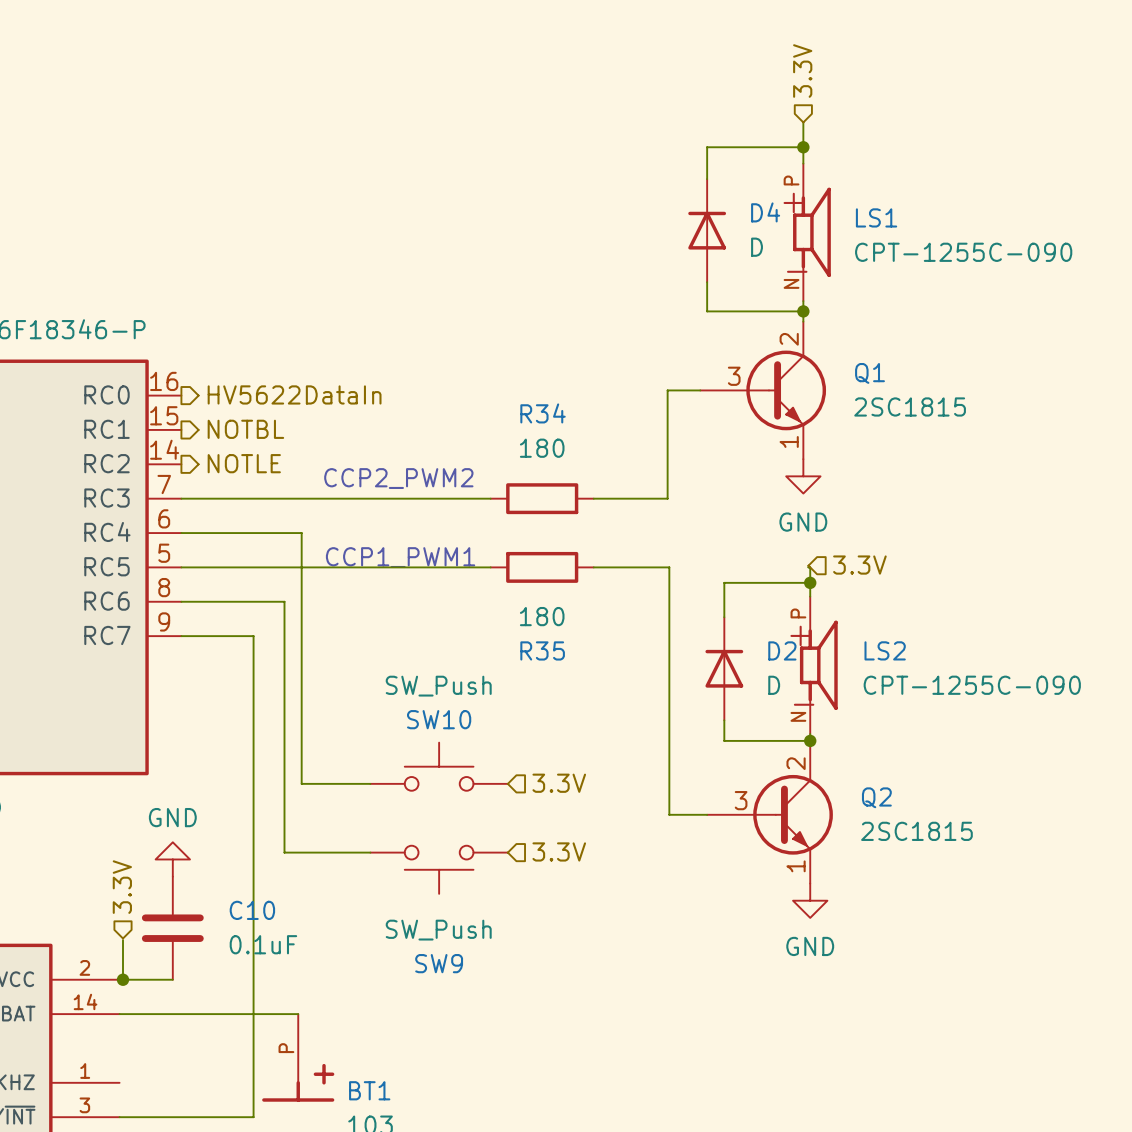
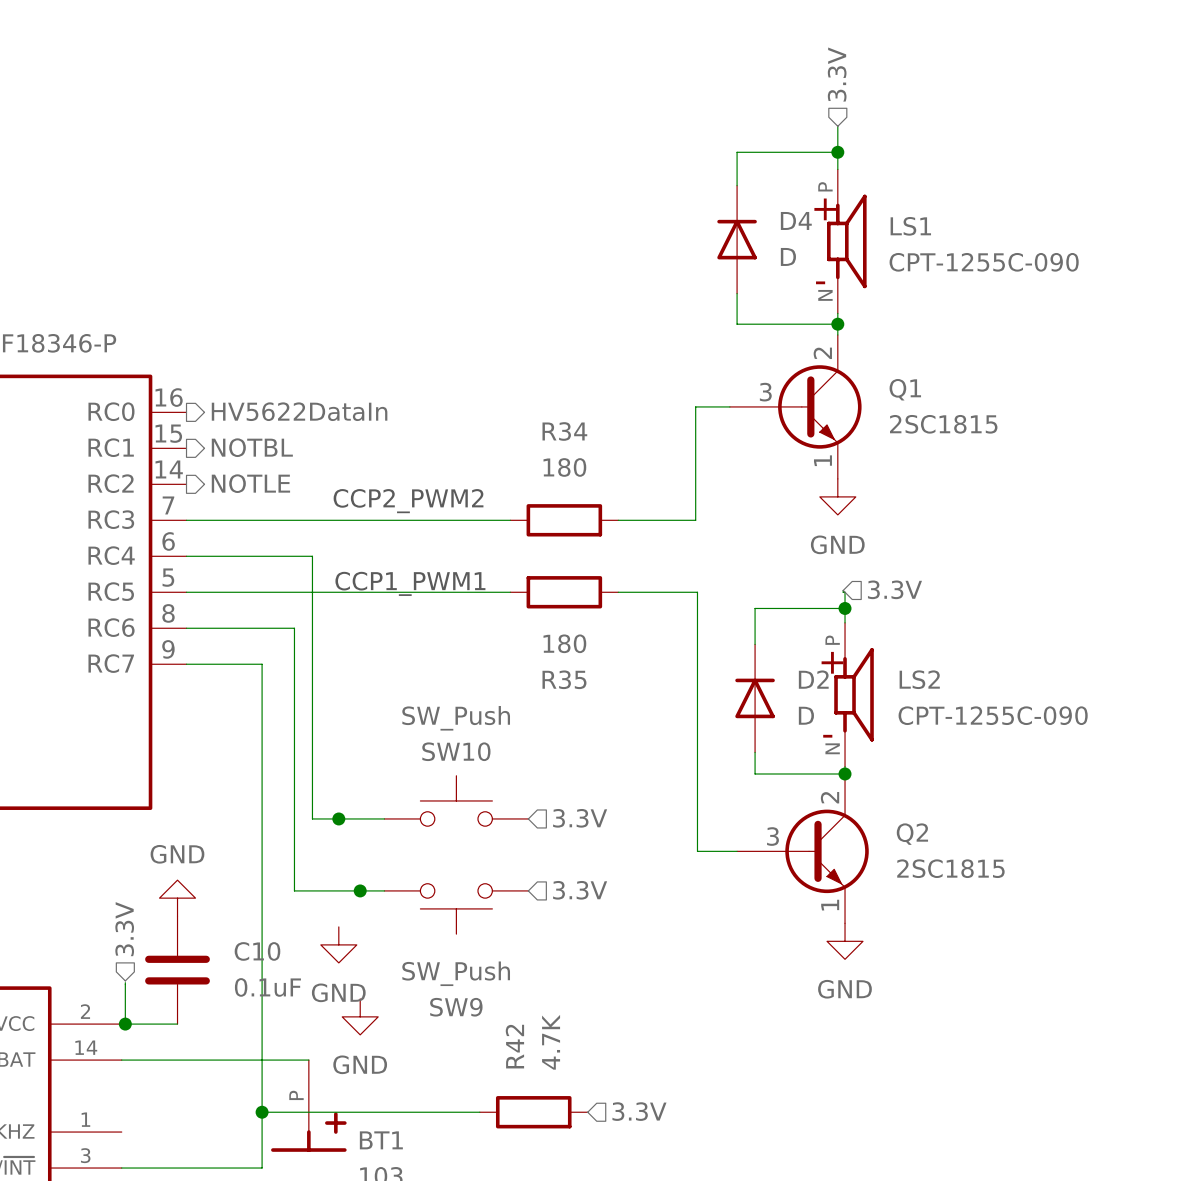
junction: none -> (338, 818)
junction: none -> (360, 890)
power symbol: none -> GND (338, 944)
power symbol: none -> GND (360, 1016)
wire: none -> (262, 1112) (479, 1112)
junction: none -> (262, 1112)
R42: none -> 4.7K (533, 1112)
hierarchical label: none -> 3.3V (639, 1111)

